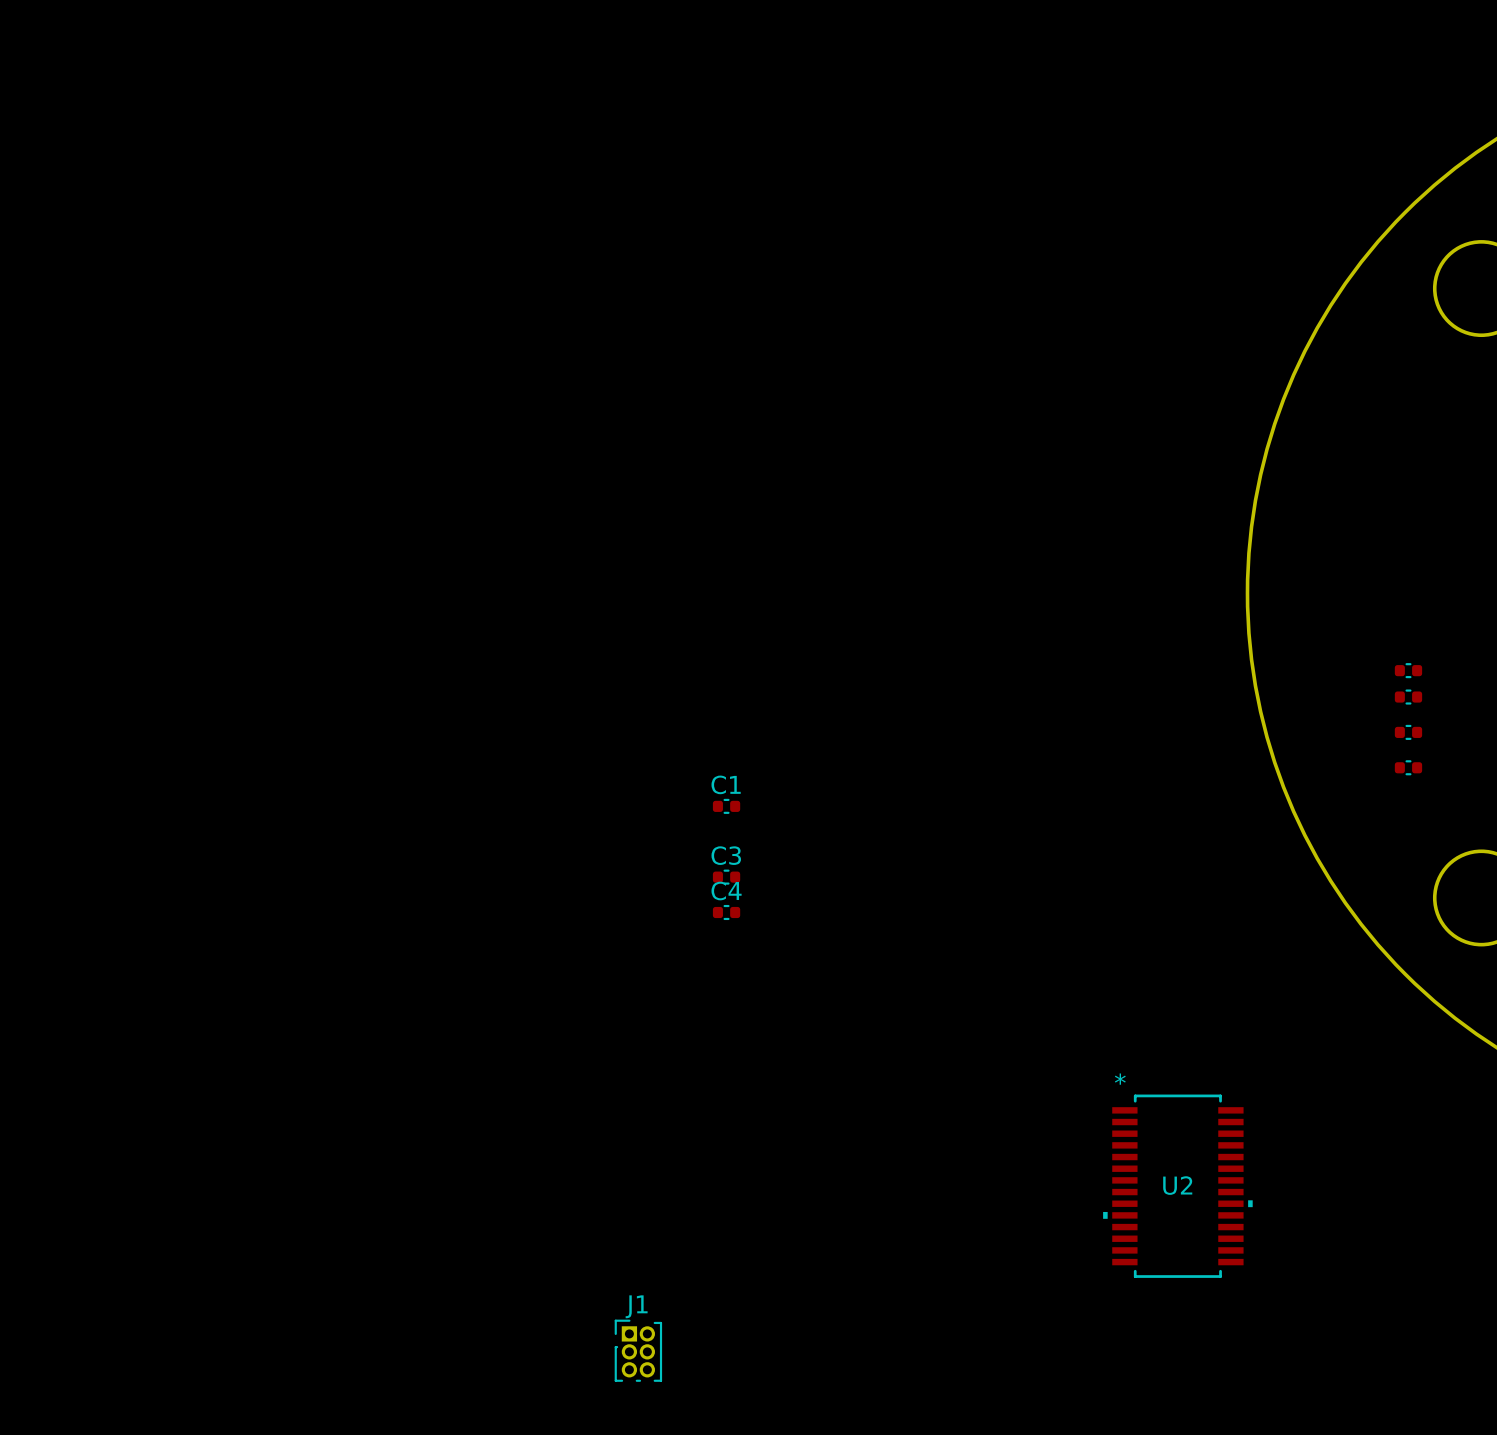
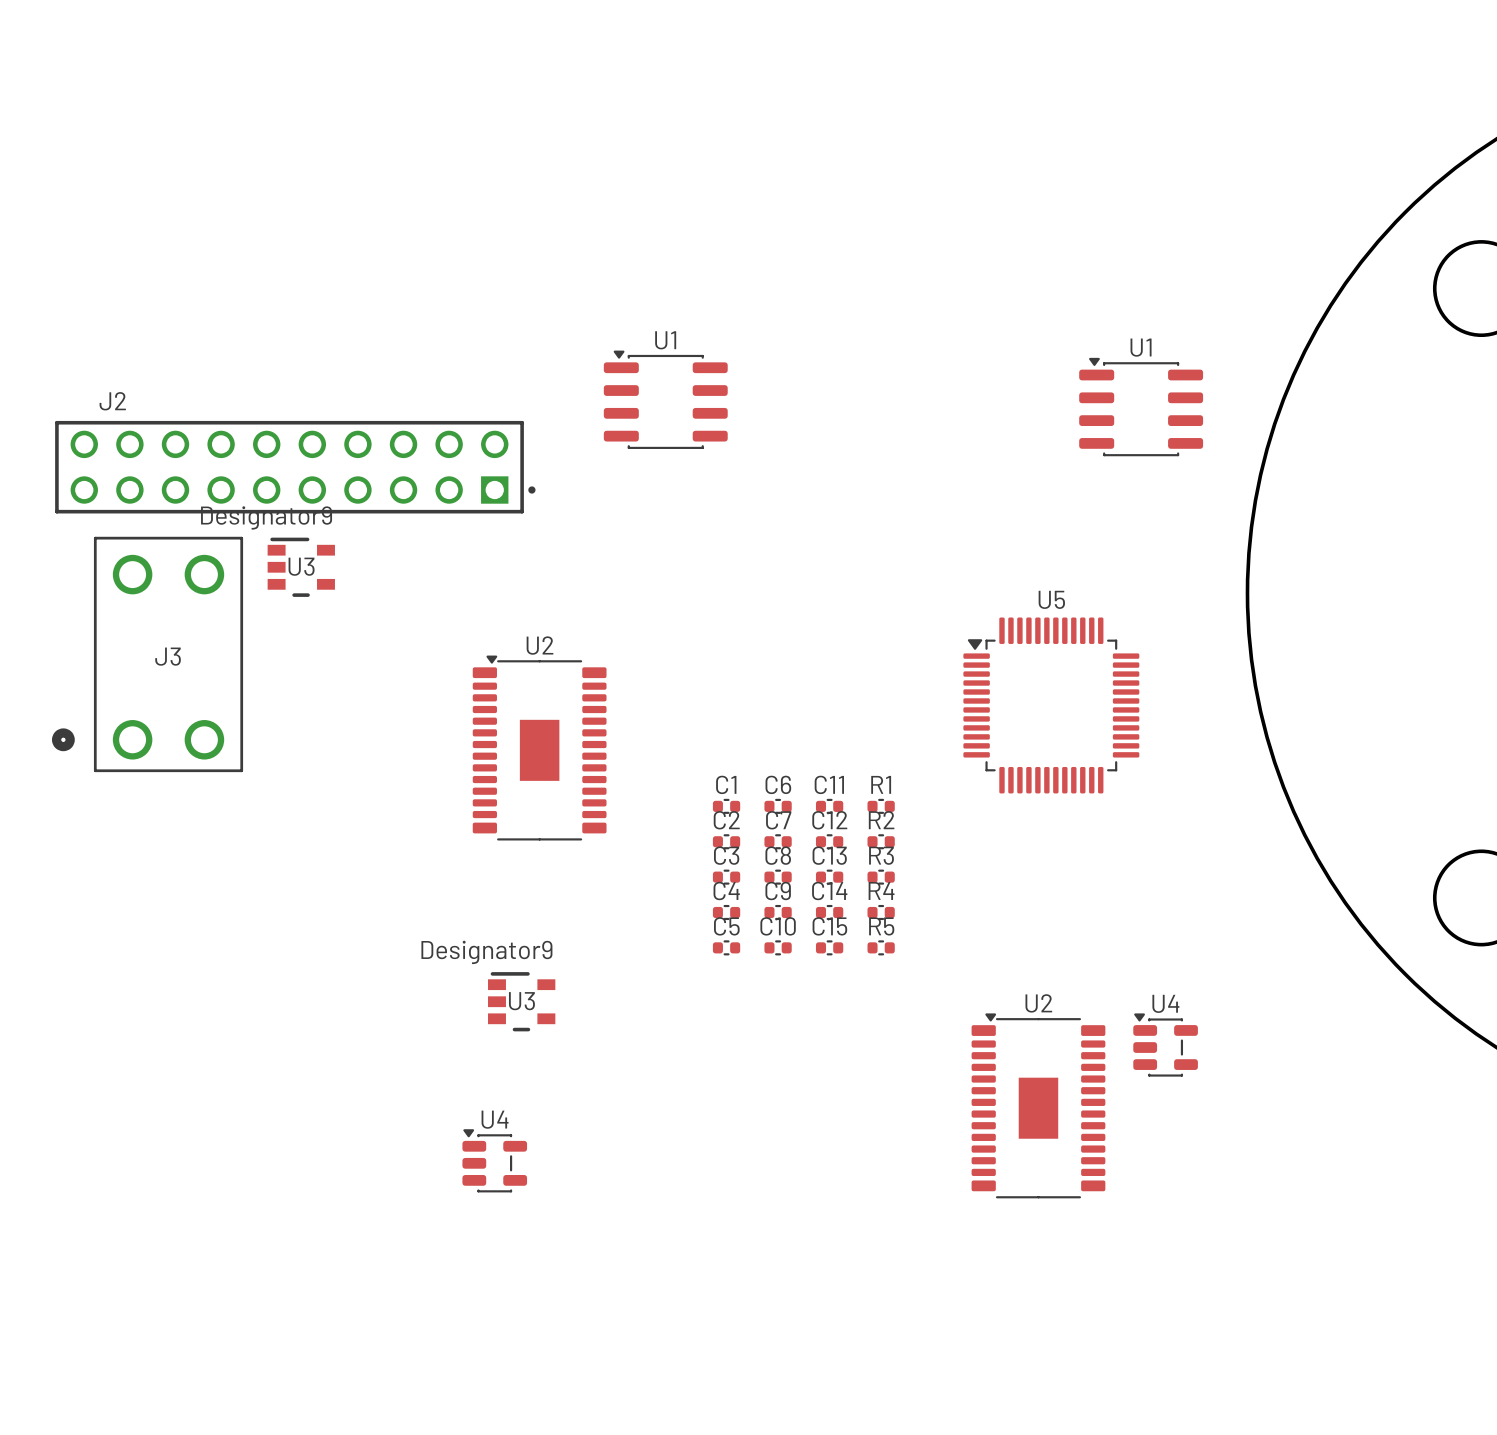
U1: none -> (665, 399)
U1: none -> (1141, 407)
J2: none -> (295, 467)
U3: none -> (301, 567)
J3: none -> (147, 654)
part: (1408, 670) -> none
part: (1408, 697) -> none
U5: none -> (1051, 705)
part: (1408, 732) -> none
U2: none -> (539, 748)
part: (1408, 767) -> none
C6: none -> (778, 806)
C11: none -> (829, 806)
R1: none -> (881, 806)
C2: none -> (726, 841)
C7: none -> (778, 841)
C12: none -> (829, 841)
R2: none -> (881, 841)
C8: none -> (778, 877)
C13: none -> (829, 877)
R3: none -> (881, 877)
C9: none -> (778, 912)
C14: none -> (829, 912)
R4: none -> (881, 912)
C5: none -> (726, 947)
C10: none -> (778, 947)
C15: none -> (829, 947)
R5: none -> (881, 947)
U3: none -> (521, 1001)
U4: none -> (1165, 1045)
U2: none -> (1038, 1105)
U4: none -> (494, 1160)
U2: (1177, 1186) -> none
J1: (638, 1350) -> none

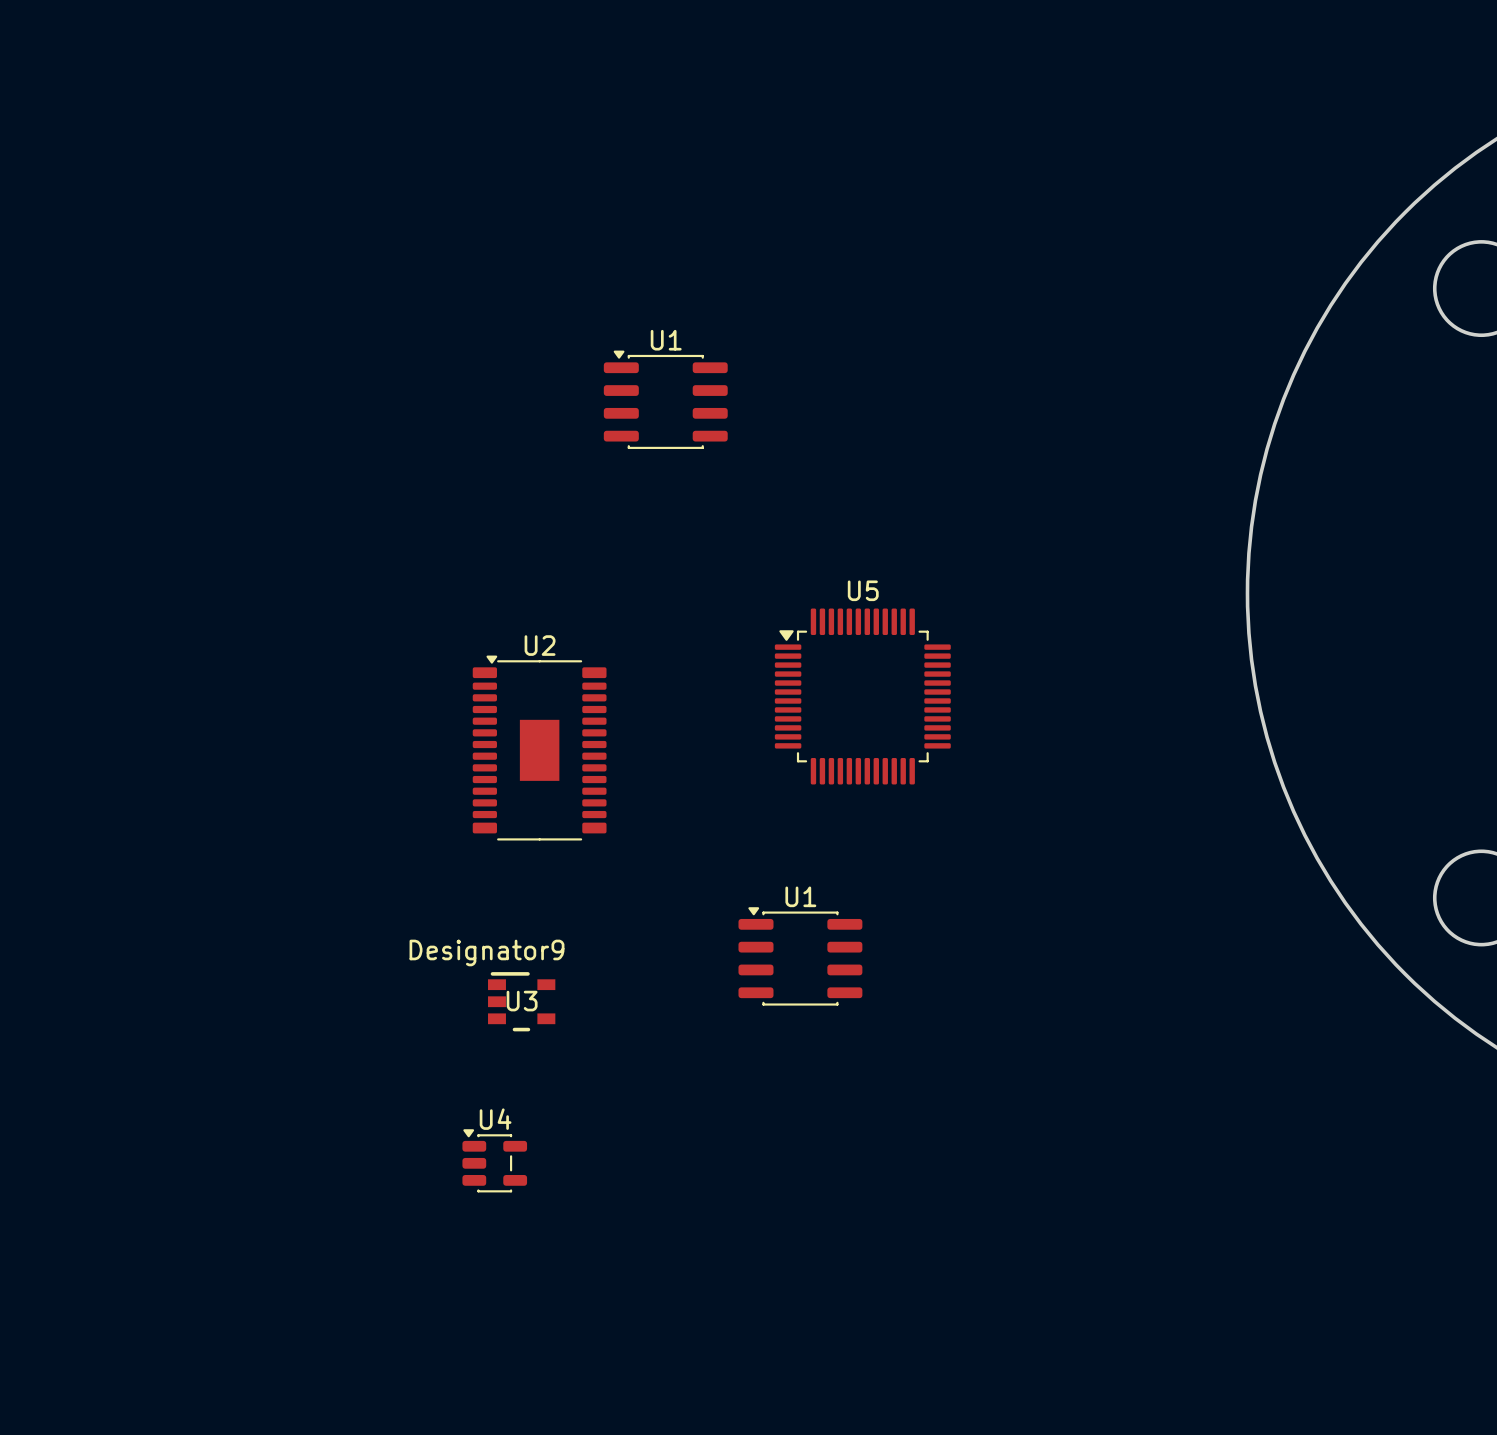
U1: (1141, 407) -> none
J2: (295, 467) -> none
U3: (301, 567) -> none
J3: (147, 654) -> none
U5 position: (1051, 705) -> (862, 696)
C1: (726, 806) -> none
C6: (778, 806) -> none
C11: (829, 806) -> none
R1: (881, 806) -> none
C2: (726, 841) -> none
C7: (778, 841) -> none
C12: (829, 841) -> none
R2: (881, 841) -> none
C3: (726, 877) -> none
C8: (778, 877) -> none
C13: (829, 877) -> none
R3: (881, 877) -> none
C4: (726, 912) -> none
C9: (778, 912) -> none
C14: (829, 912) -> none
R4: (881, 912) -> none
C5: (726, 947) -> none
C10: (778, 947) -> none
C15: (829, 947) -> none
R5: (881, 947) -> none
U1: none -> (800, 956)
U4: (1165, 1045) -> none
U2: (1038, 1105) -> none

